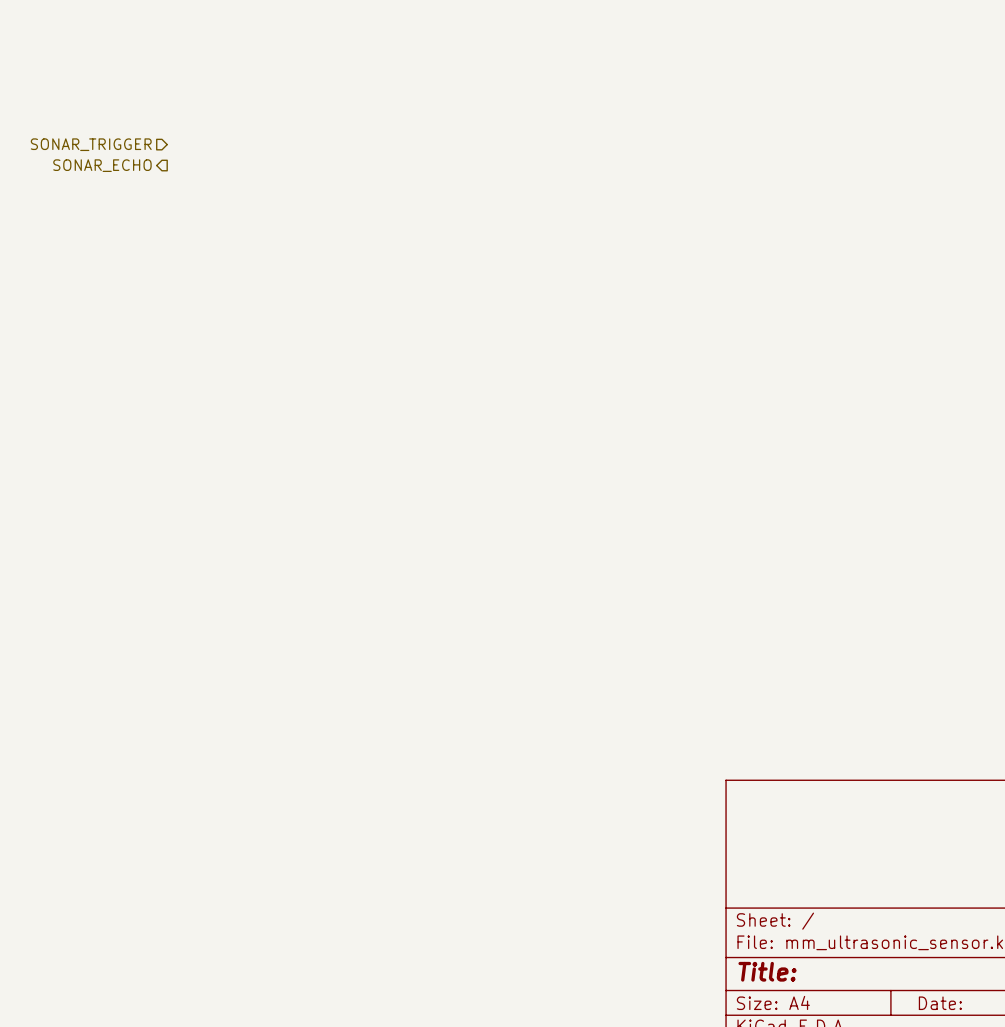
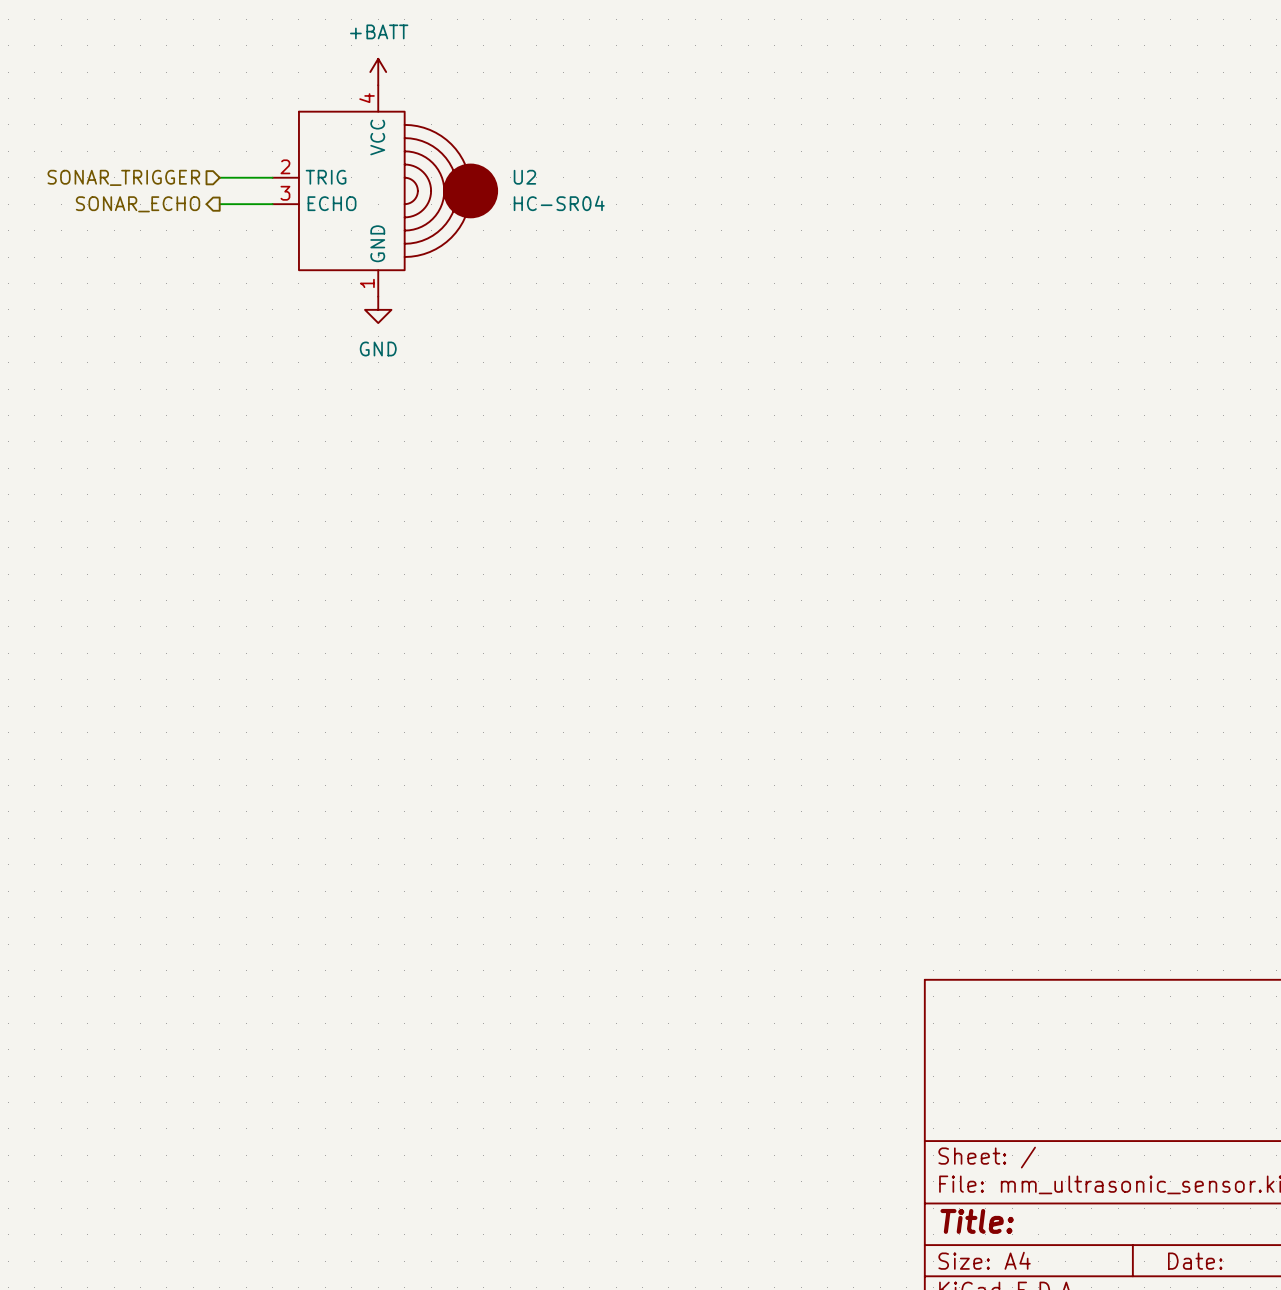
power symbol: none -> +BATT (378, 72)
wire: none -> (219, 177) (272, 177)
U2: none -> HC-SR04 (384, 190)
wire: none -> (219, 204) (272, 204)
power symbol: none -> GND (378, 309)

